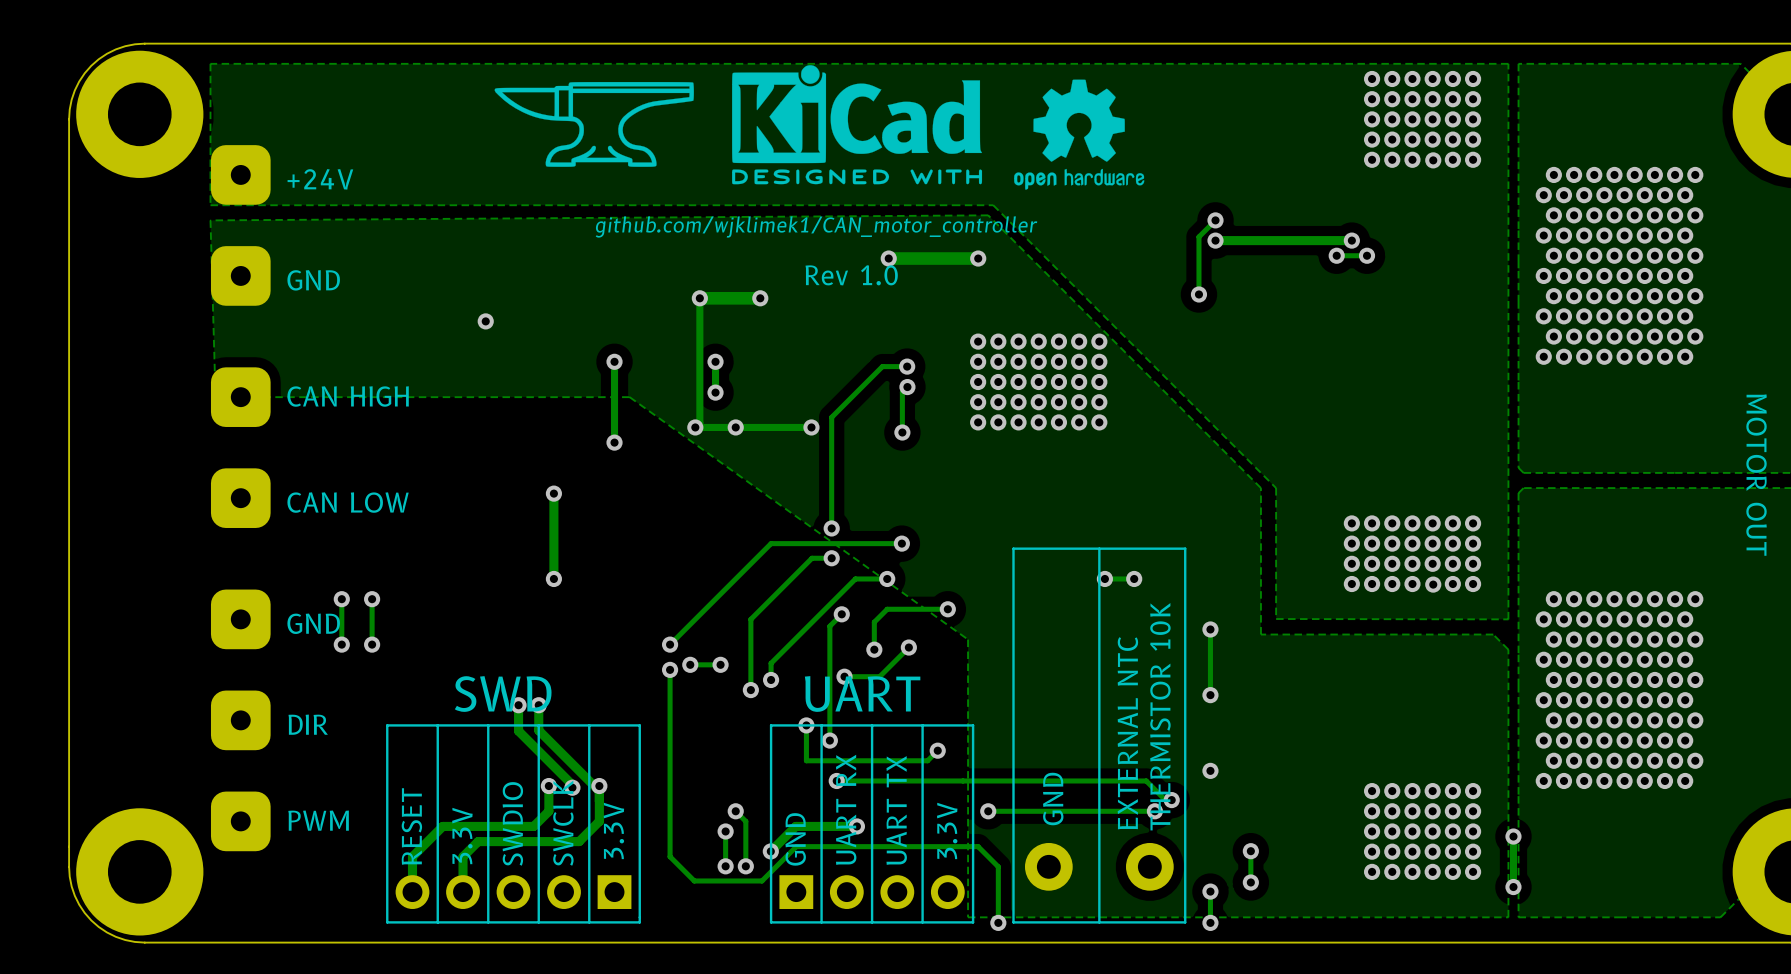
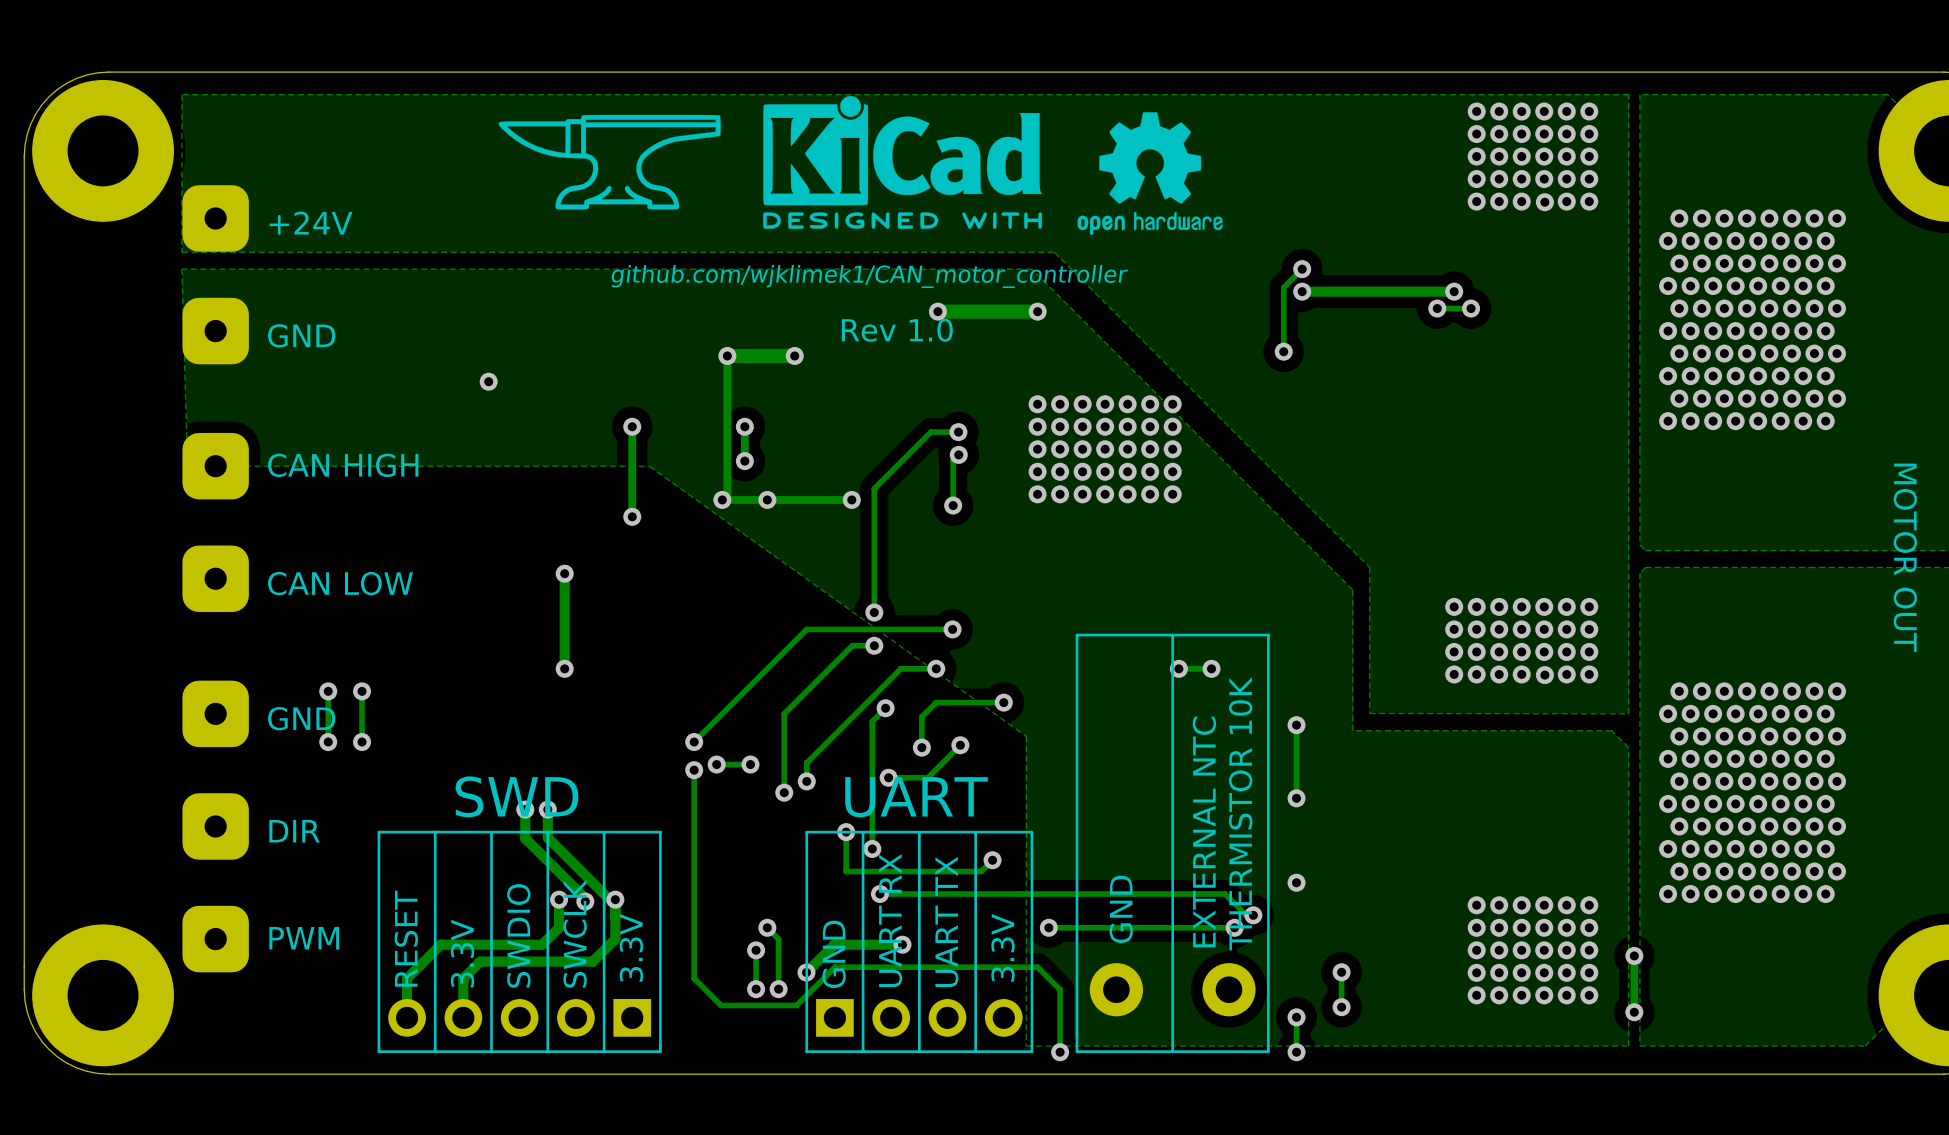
zone outline: (210, 220) (988, 215) (1260, 488) (1260, 508) -> (181, 269) (1031, 269) (1352, 590)

